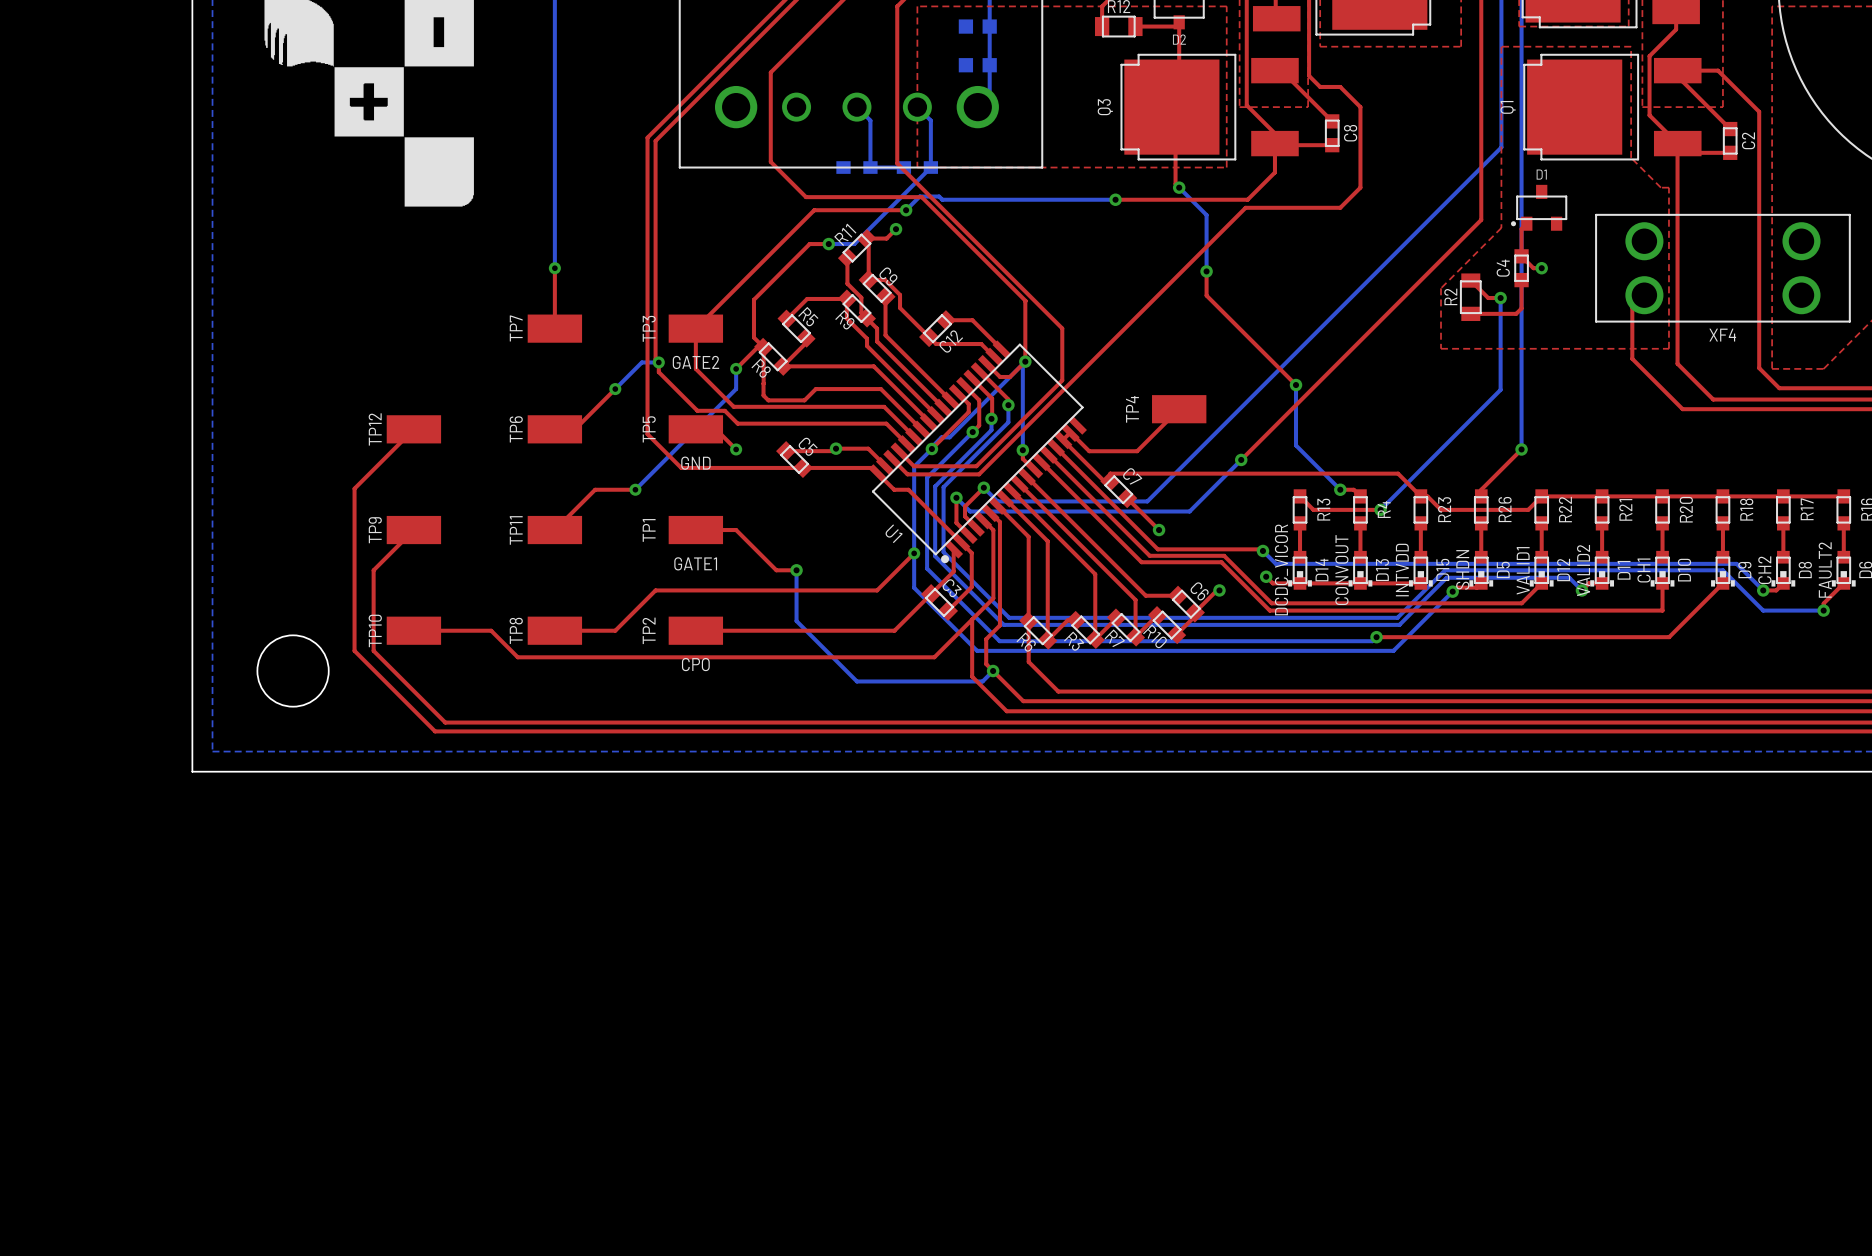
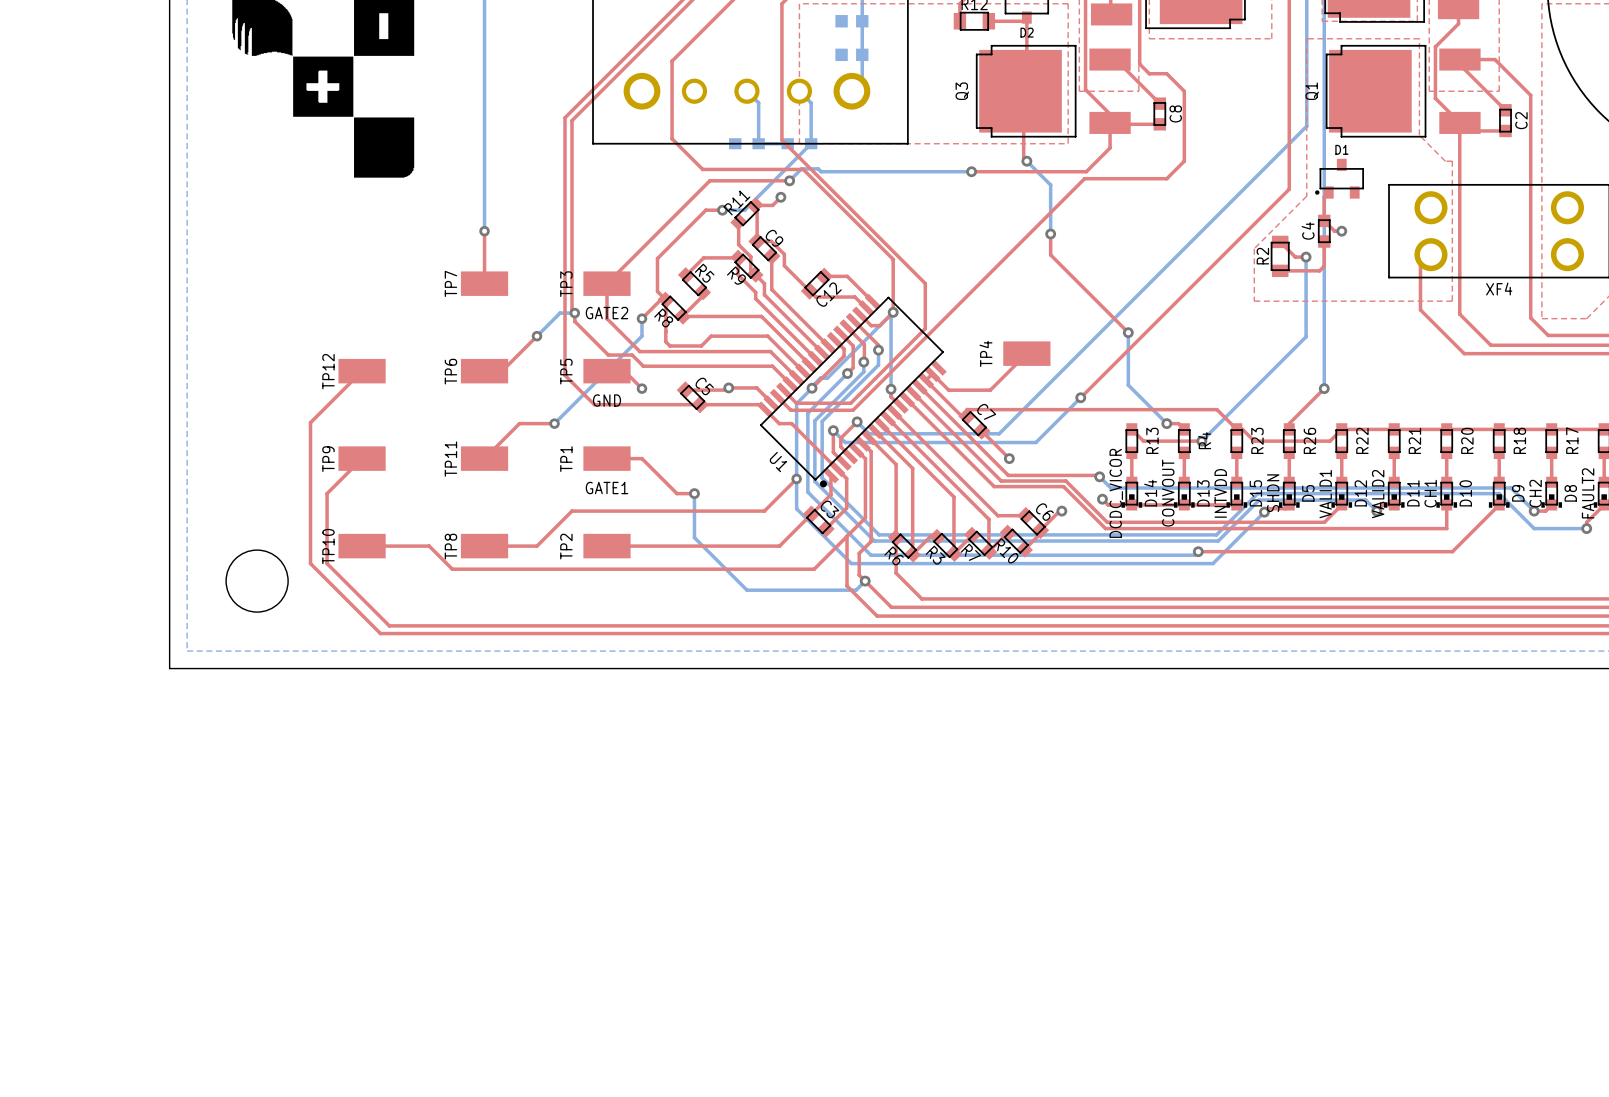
text: CPO (695, 664) -> none

